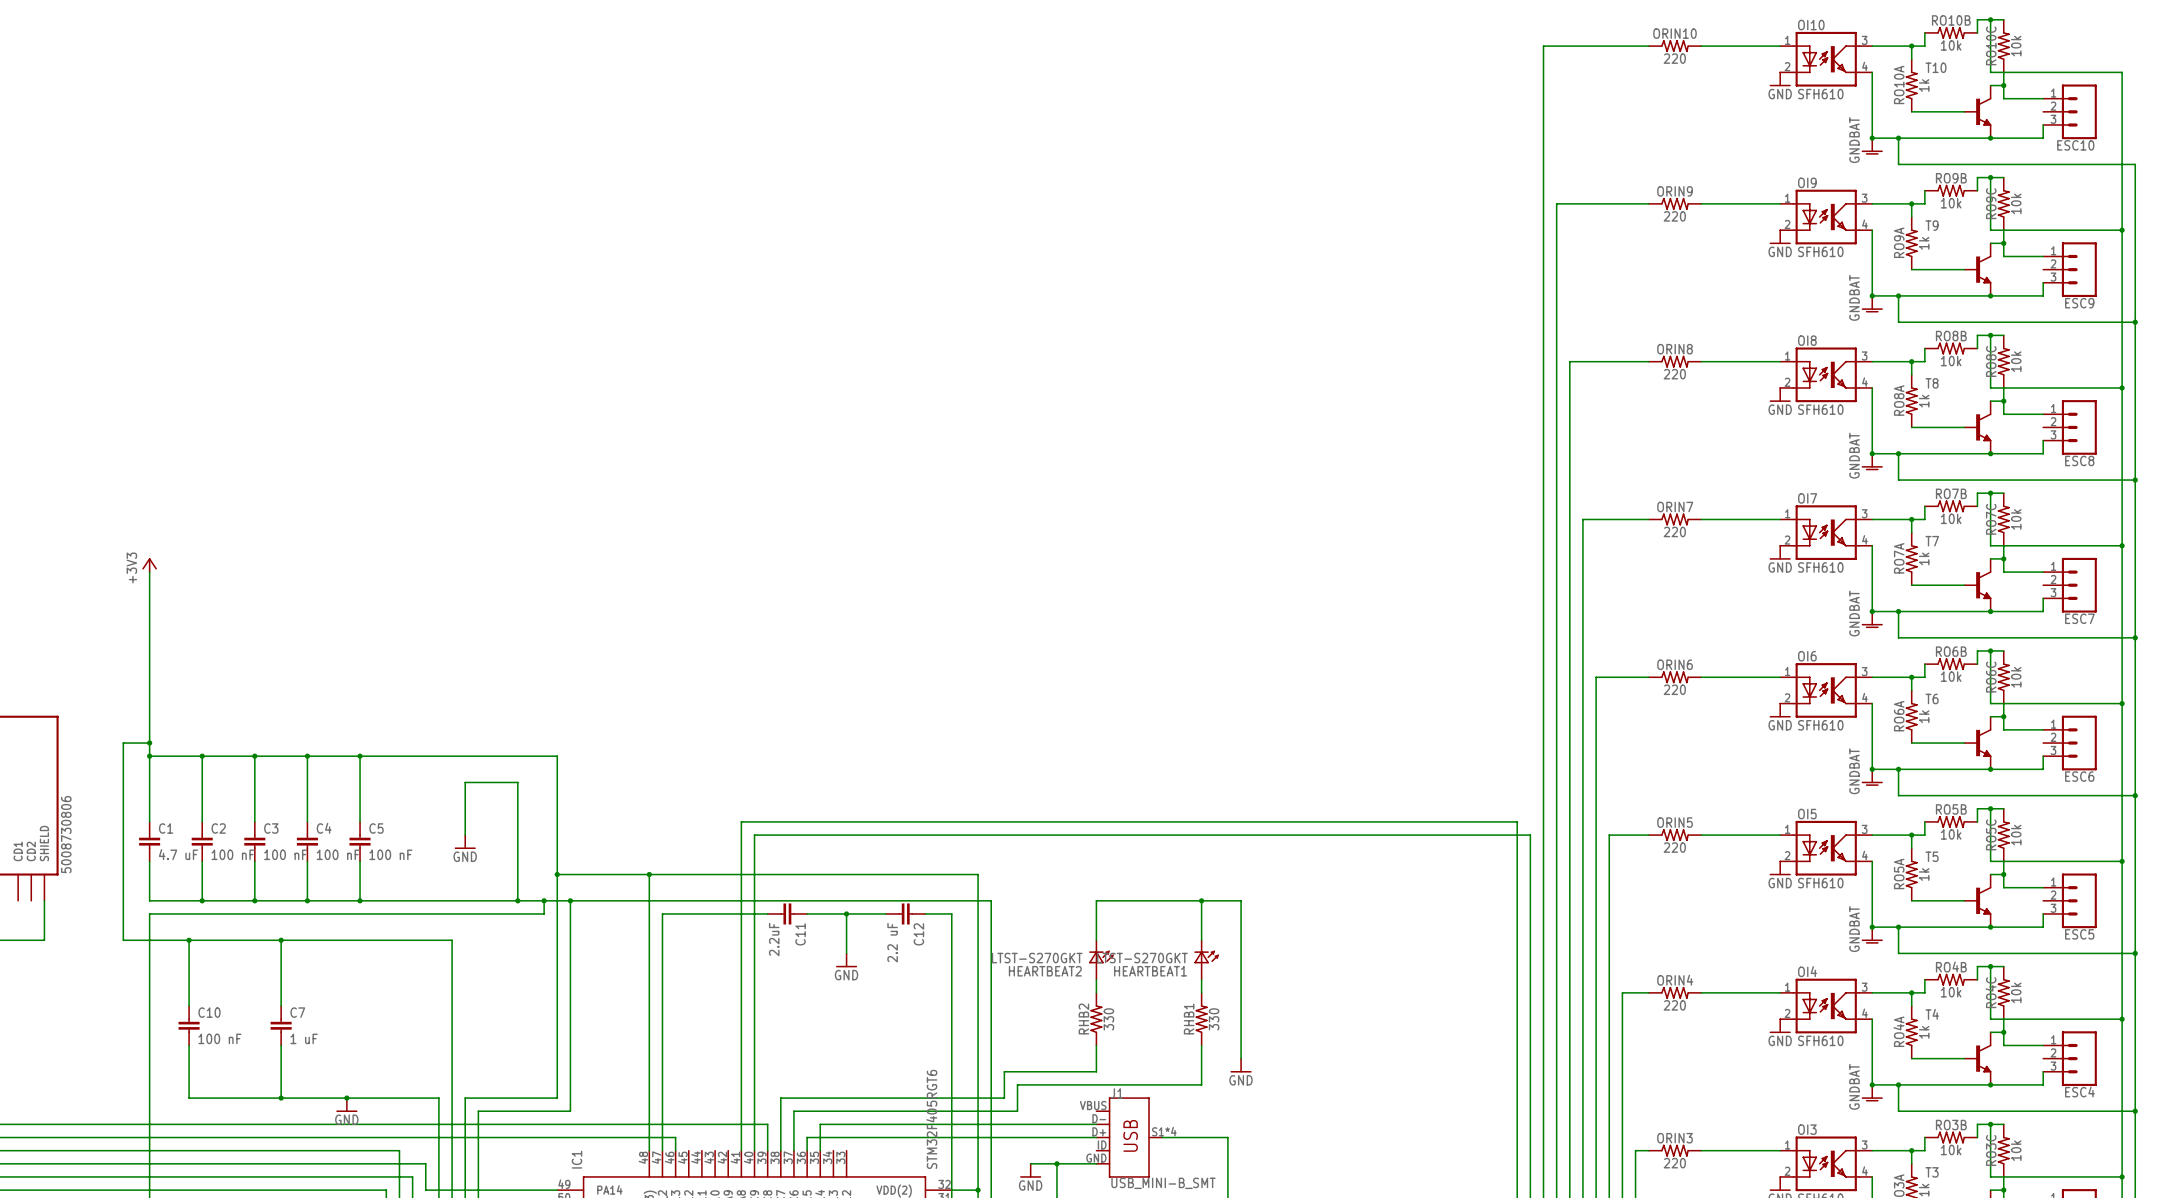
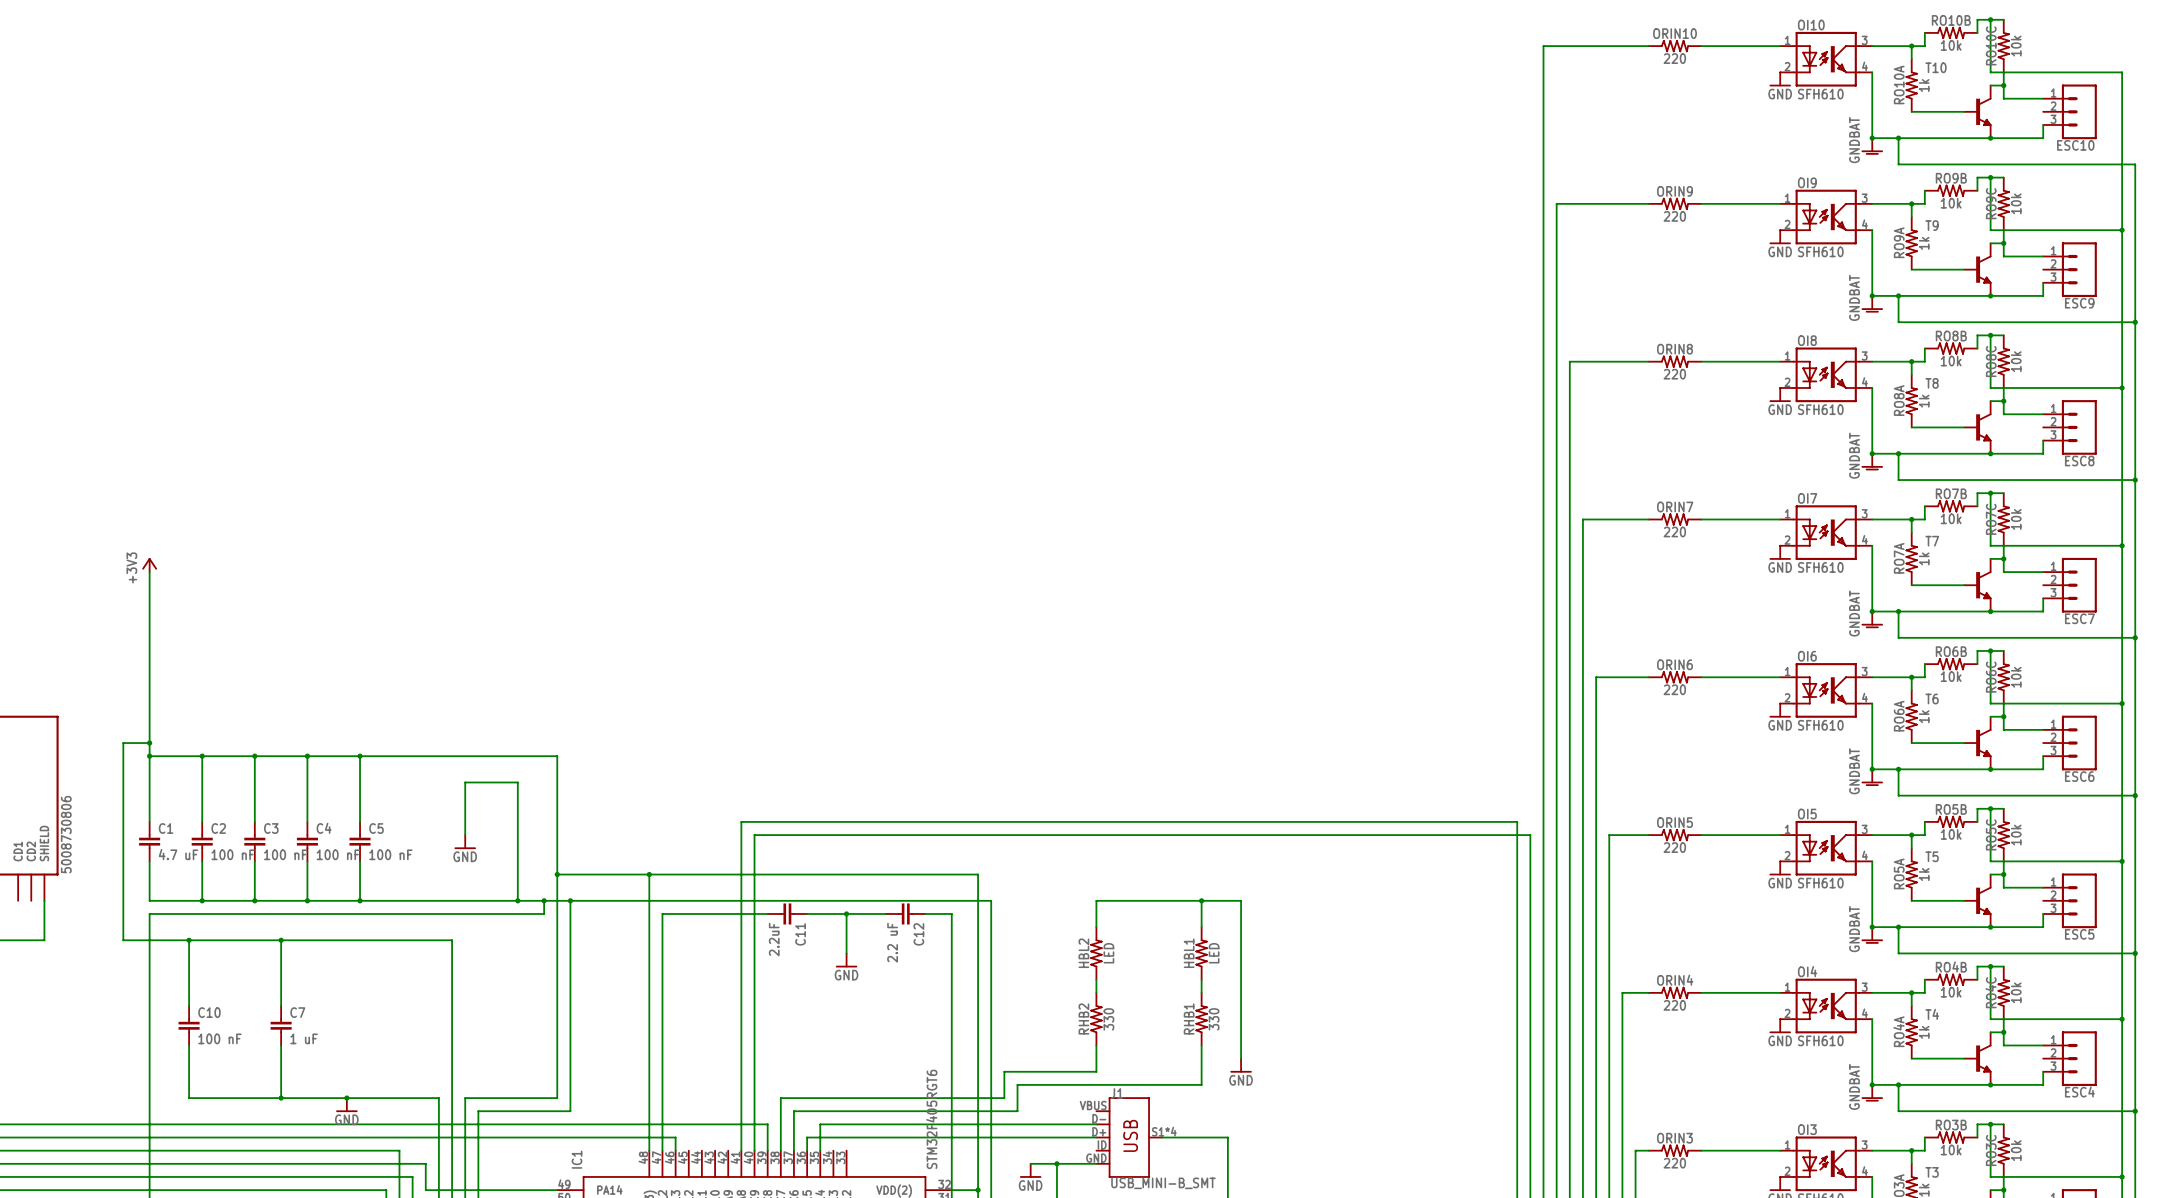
HBL2: none -> LED (1096, 953)
HBL1: none -> LED (1201, 953)
HEARTBEAT2: LTST-S270GKT (1101, 960) -> none
HEARTBEAT1: LTST-S270GKT (1206, 960) -> none

